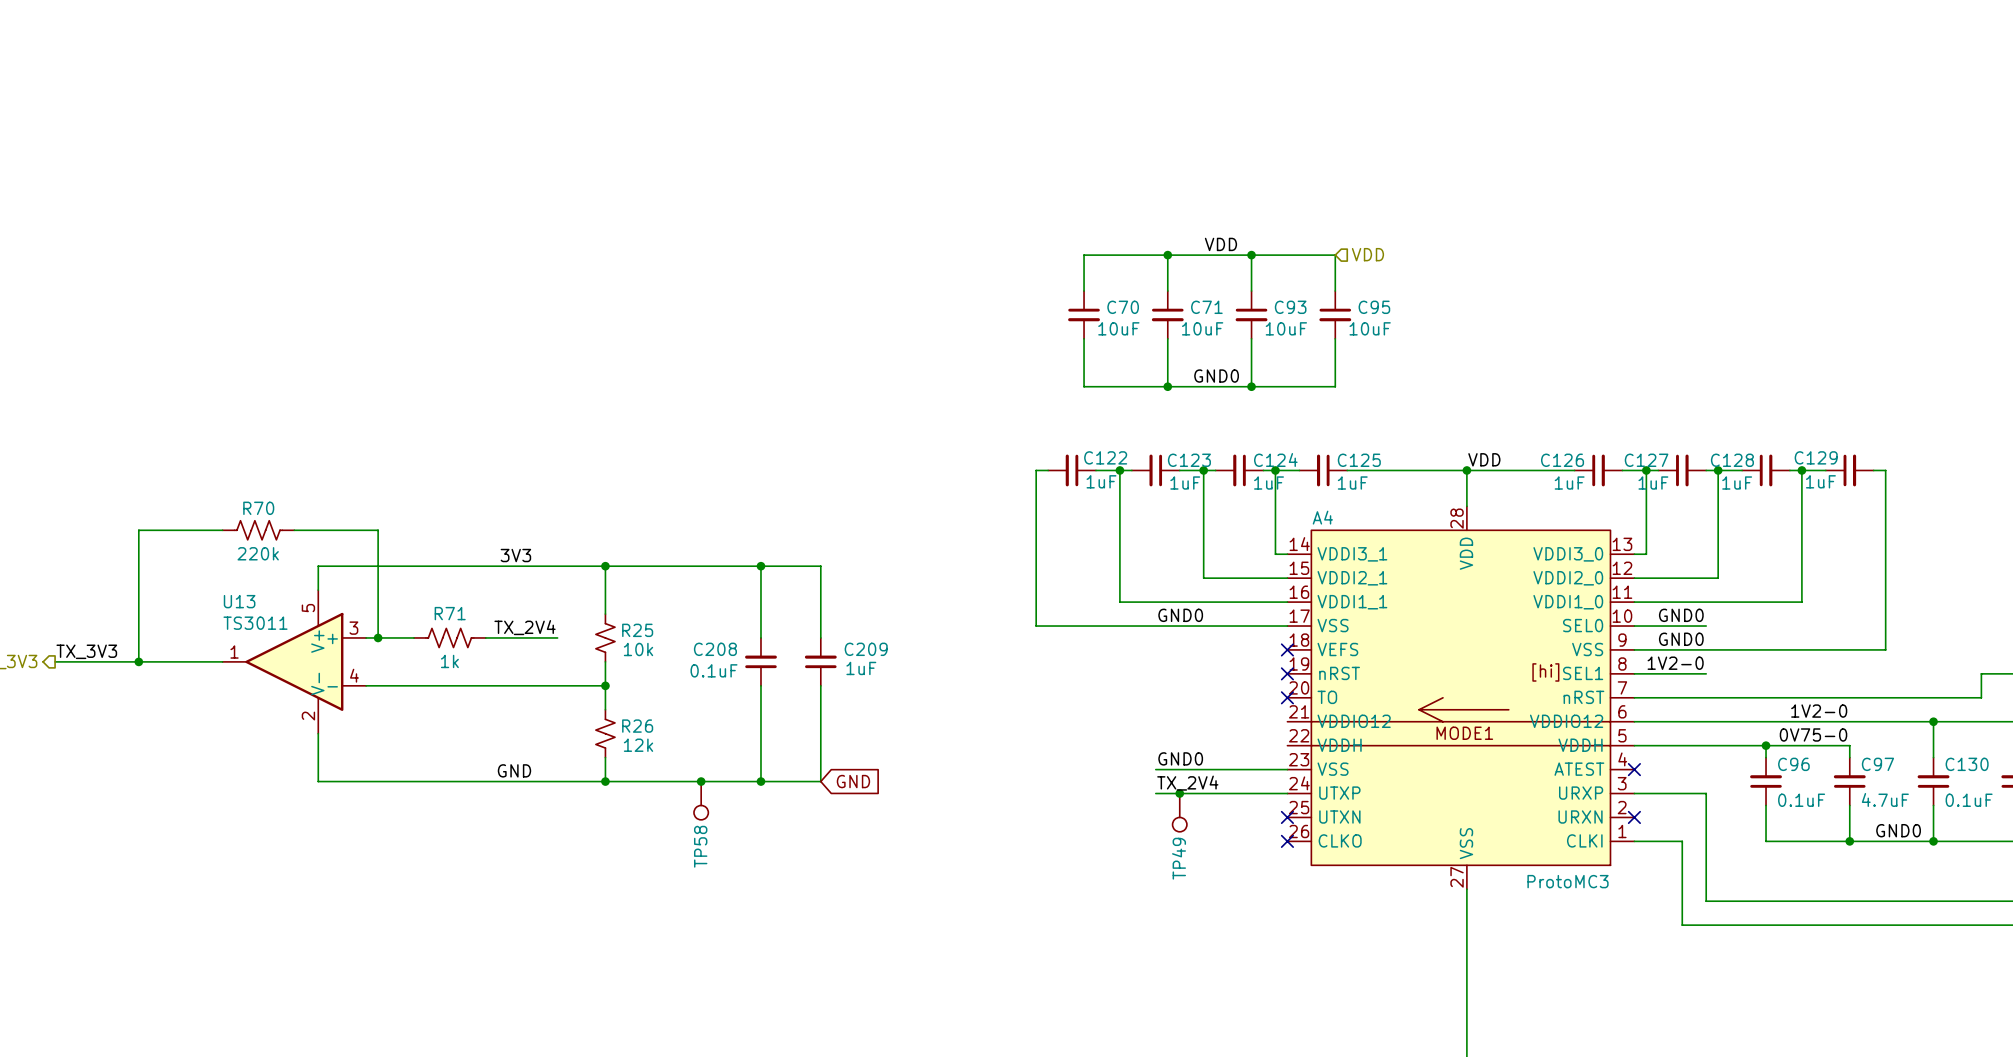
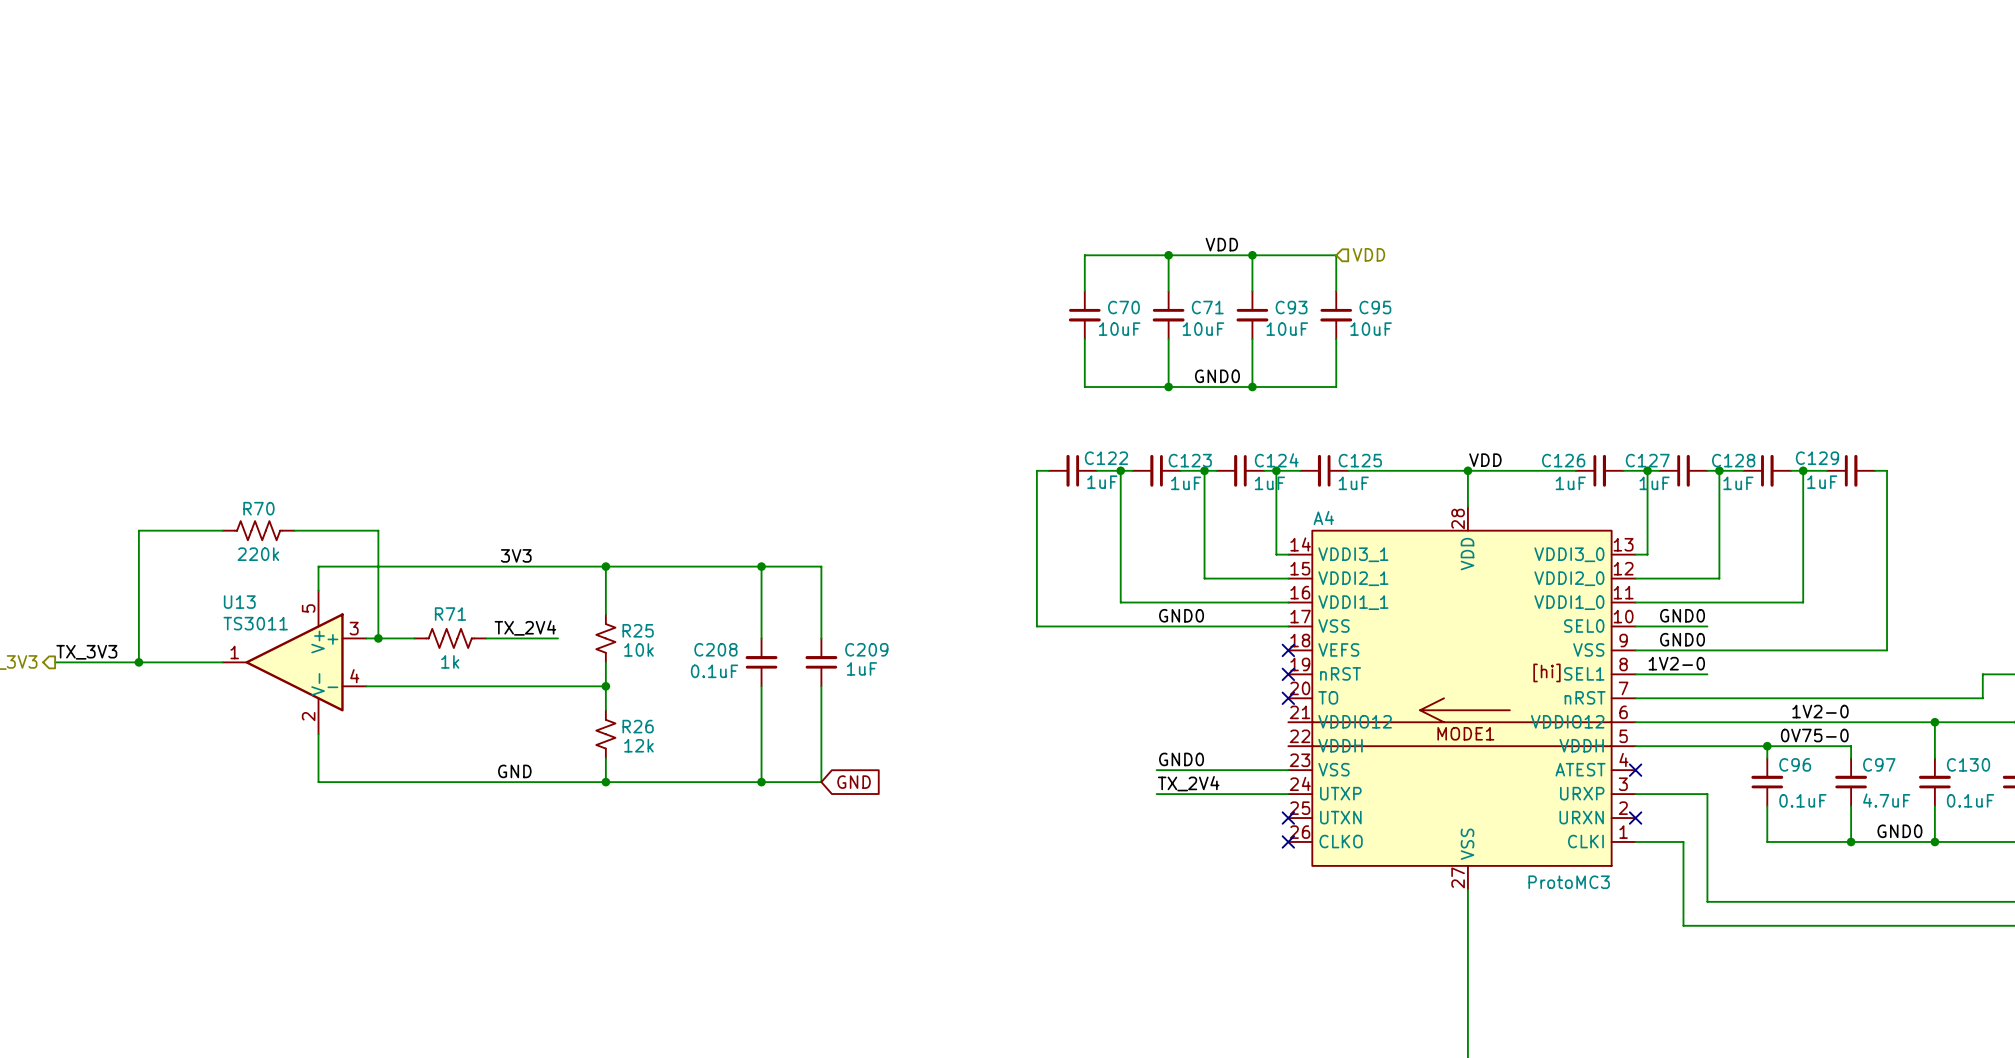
junction: (701, 781) -> none
junction: (1179, 793) -> none
TP58: (701, 800) -> none
TP49: (1179, 812) -> none

